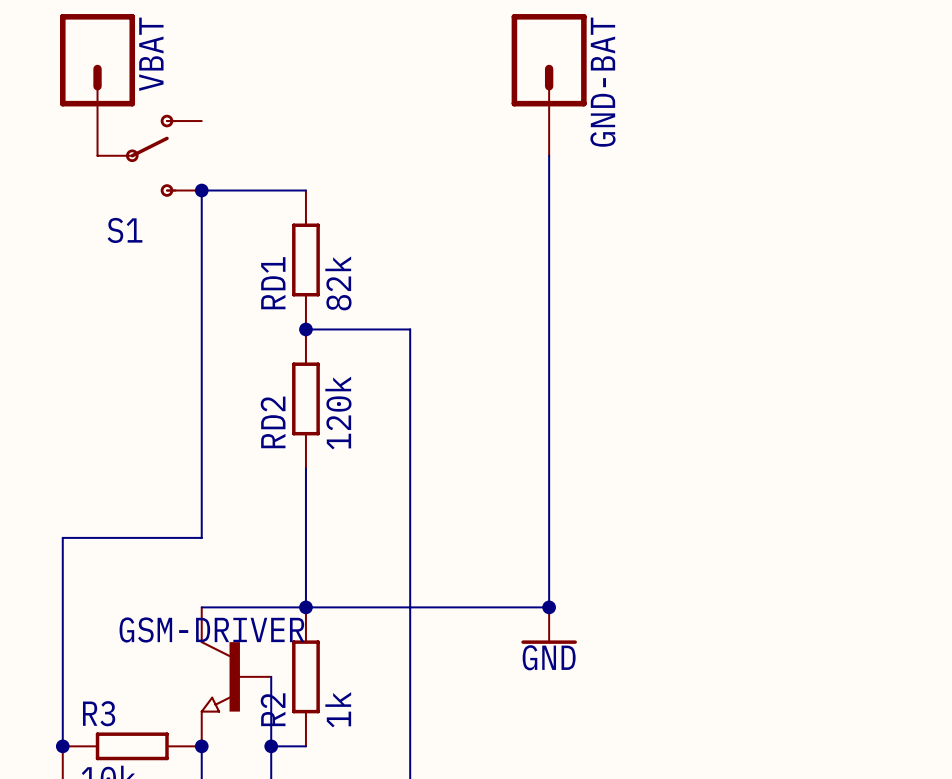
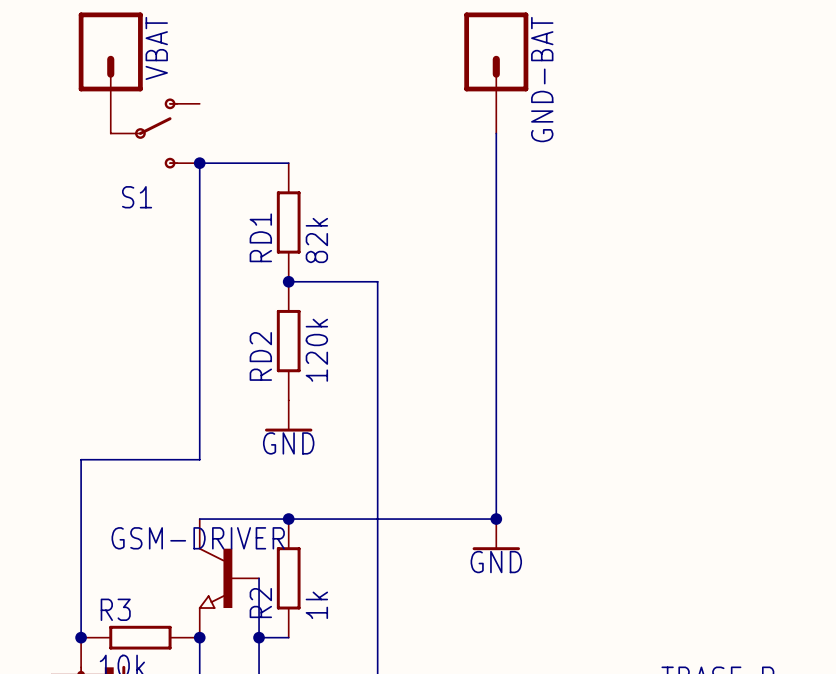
wire: (305, 468) (305, 607) -> none
power symbol: none -> GND (288, 415)

